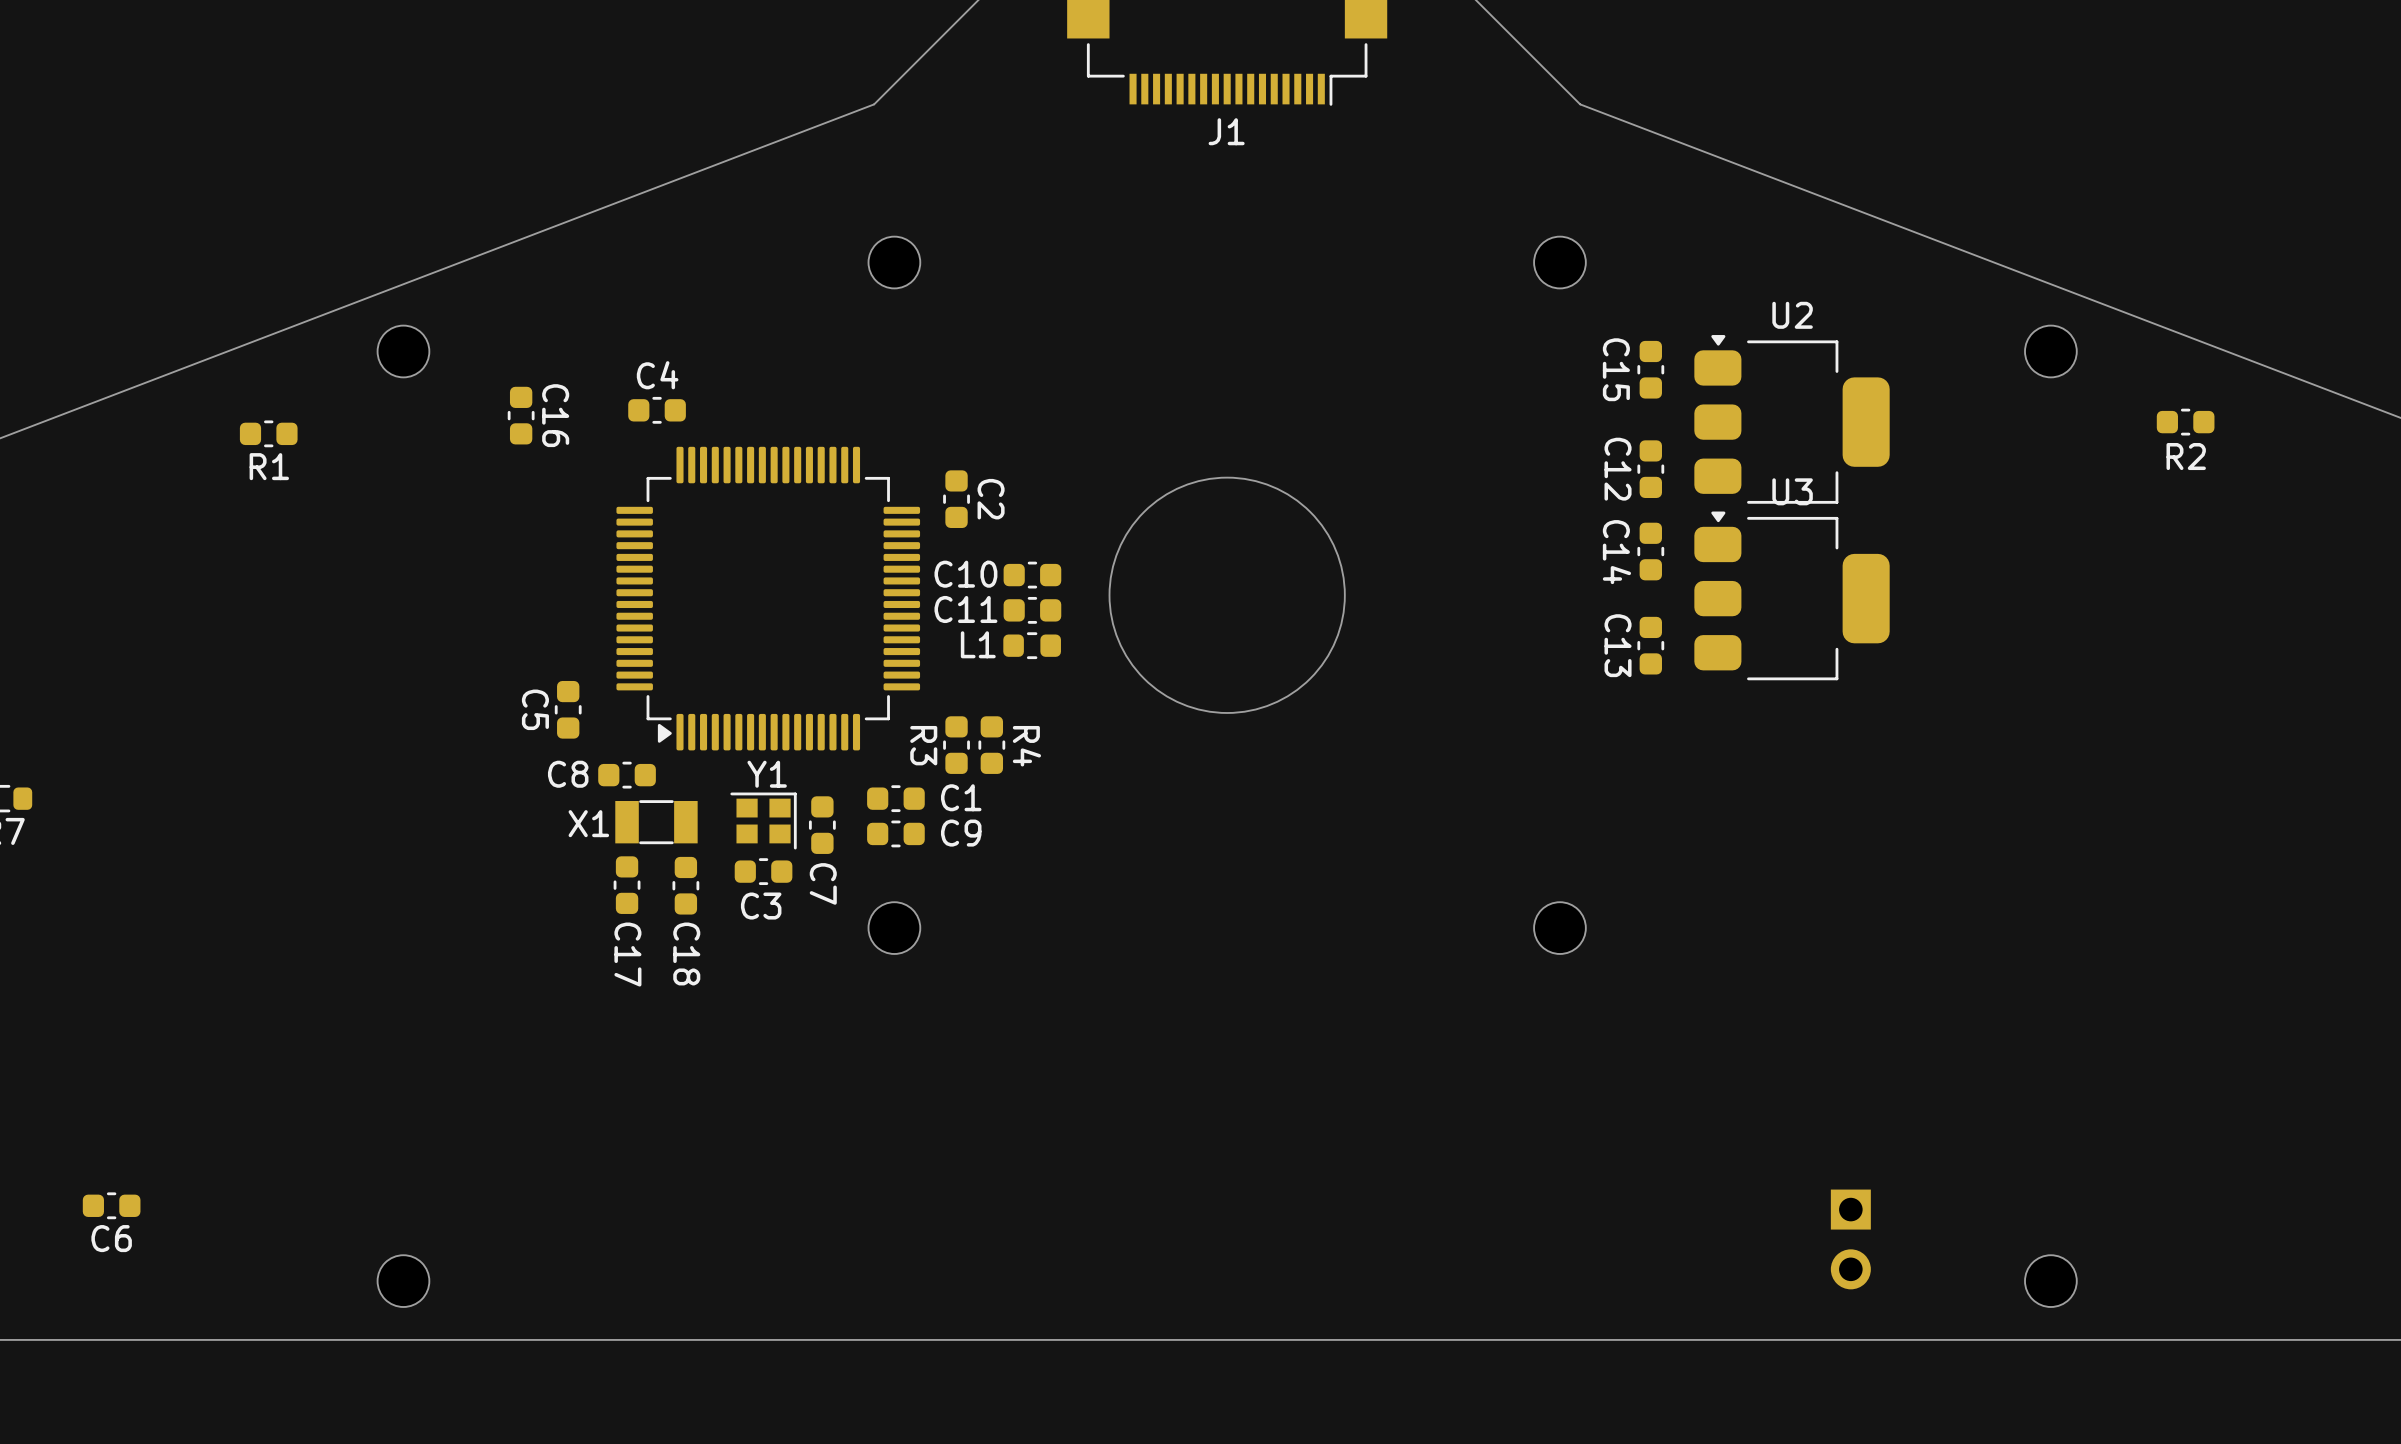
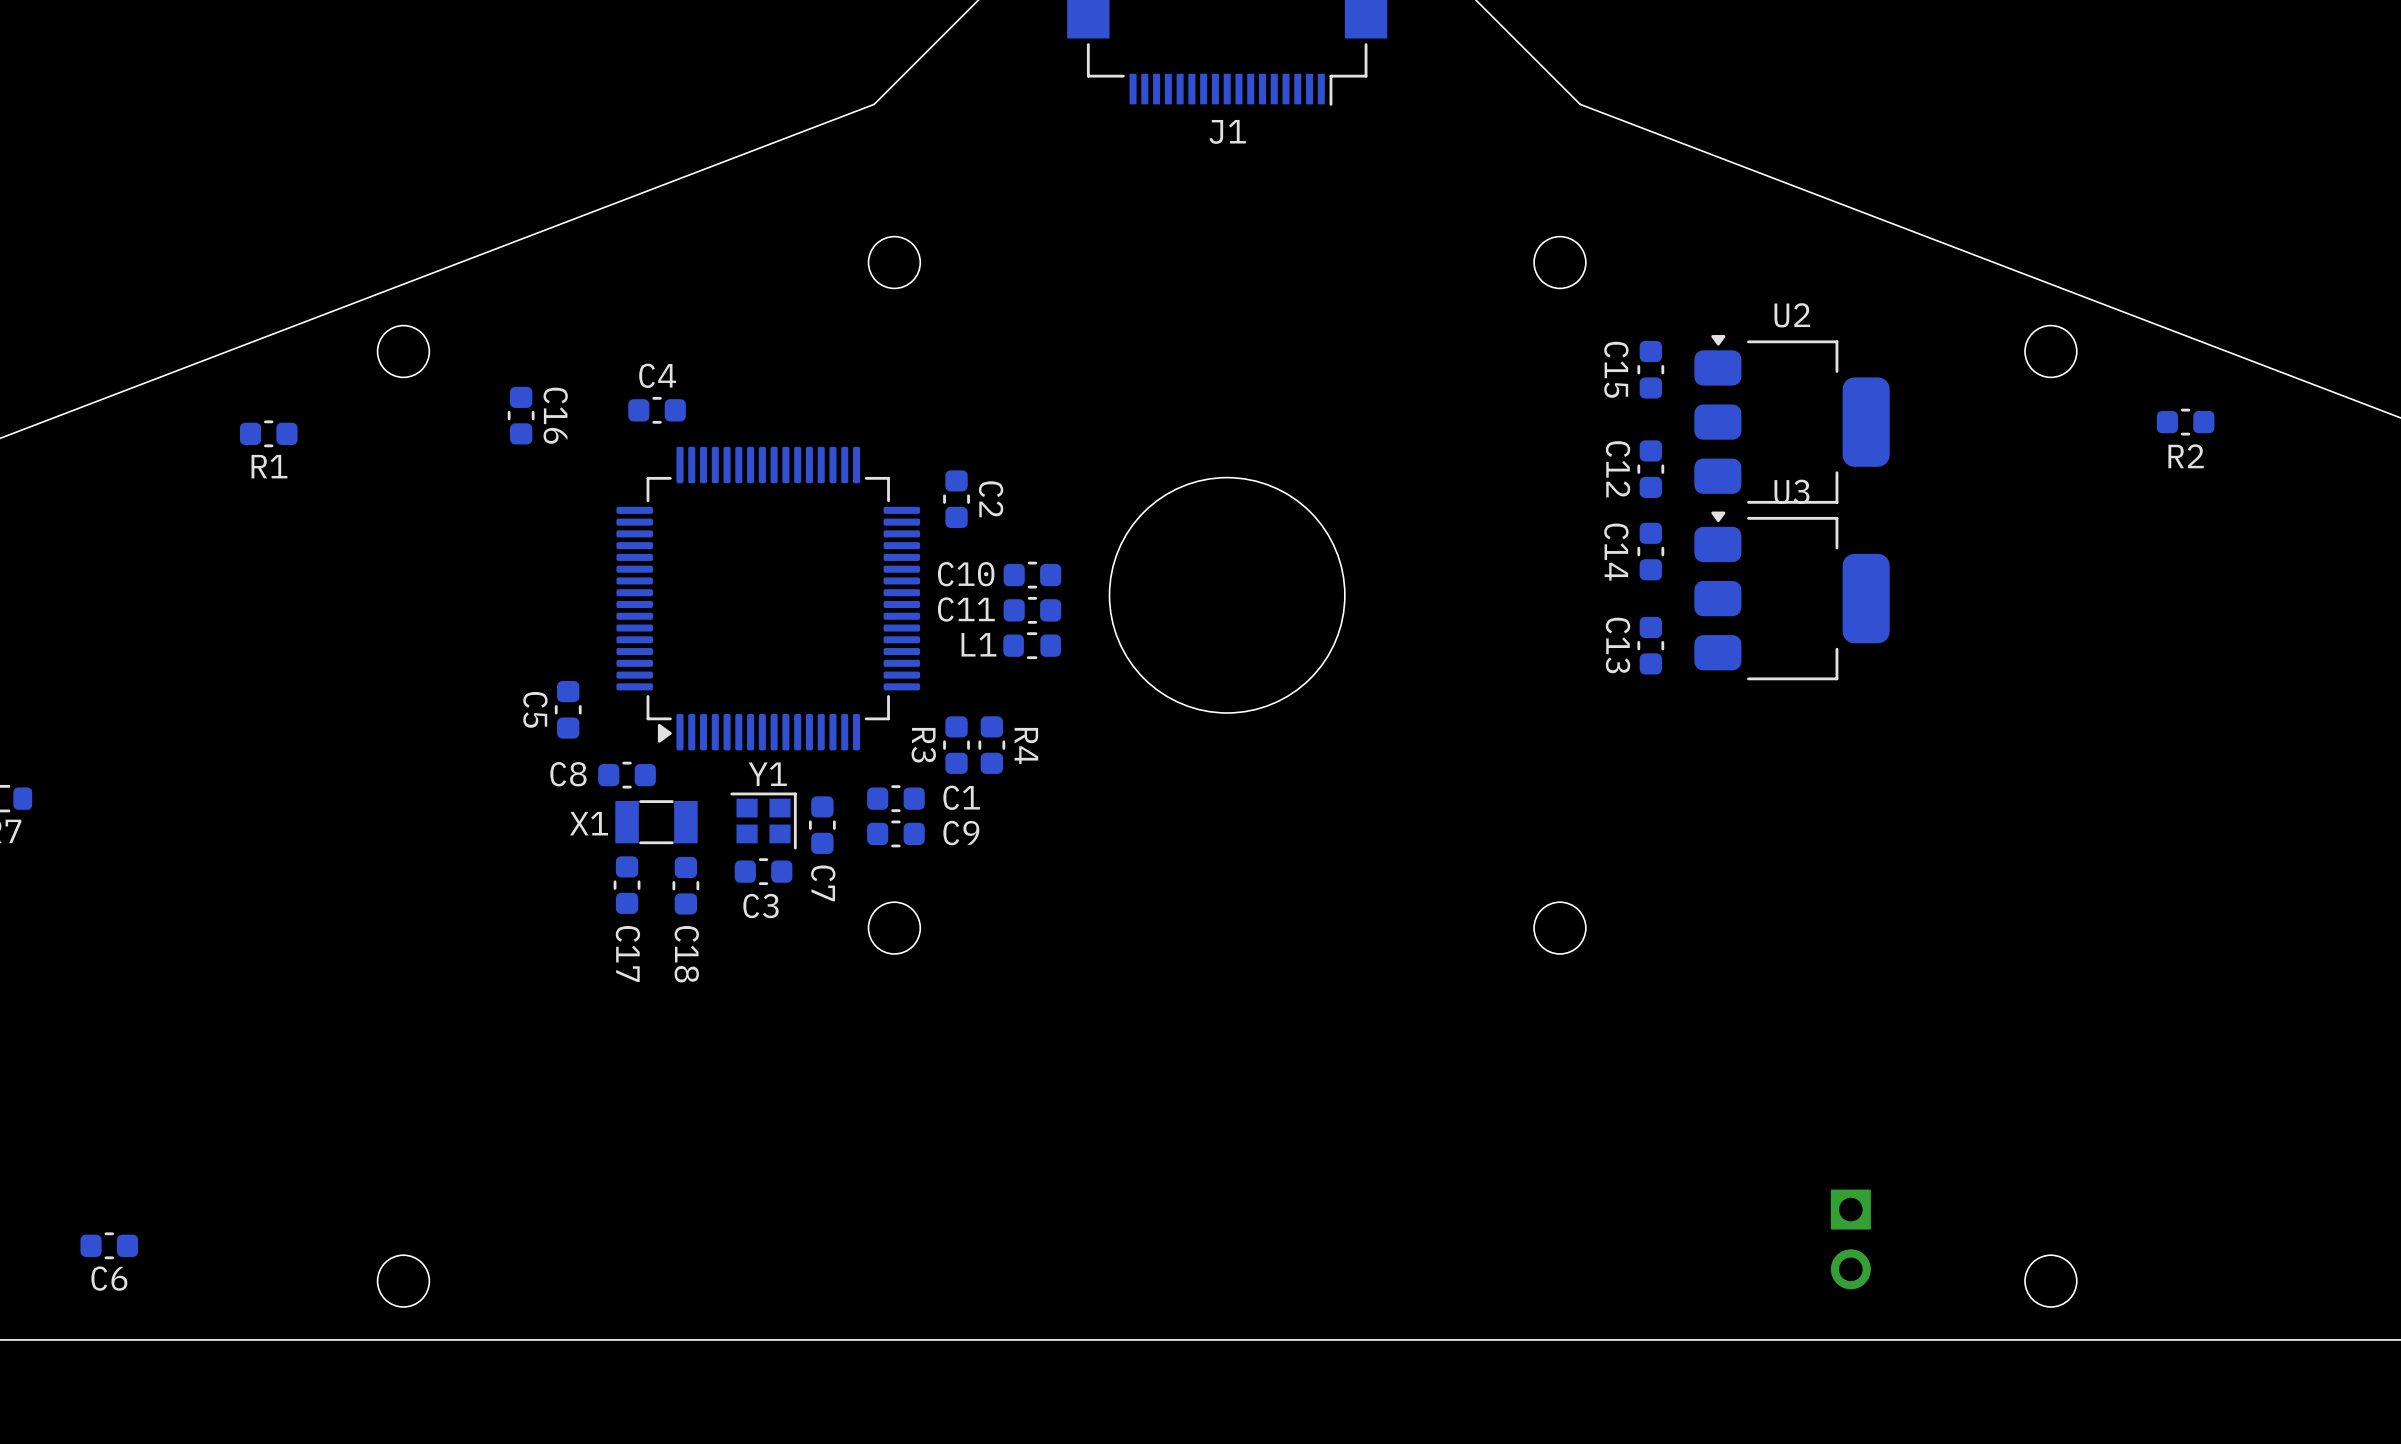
C6 position: (111, 1205) -> (109, 1245)

